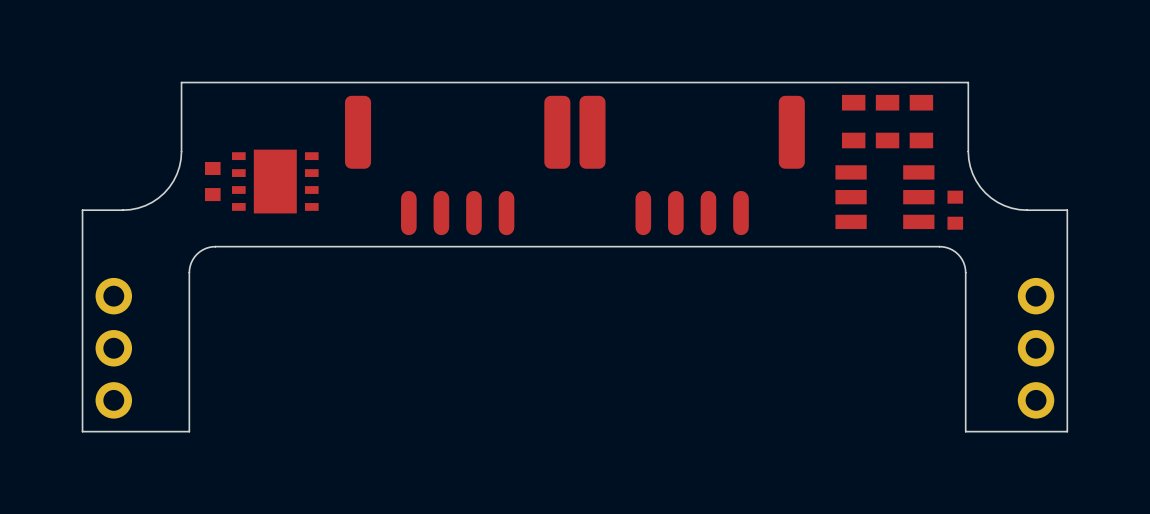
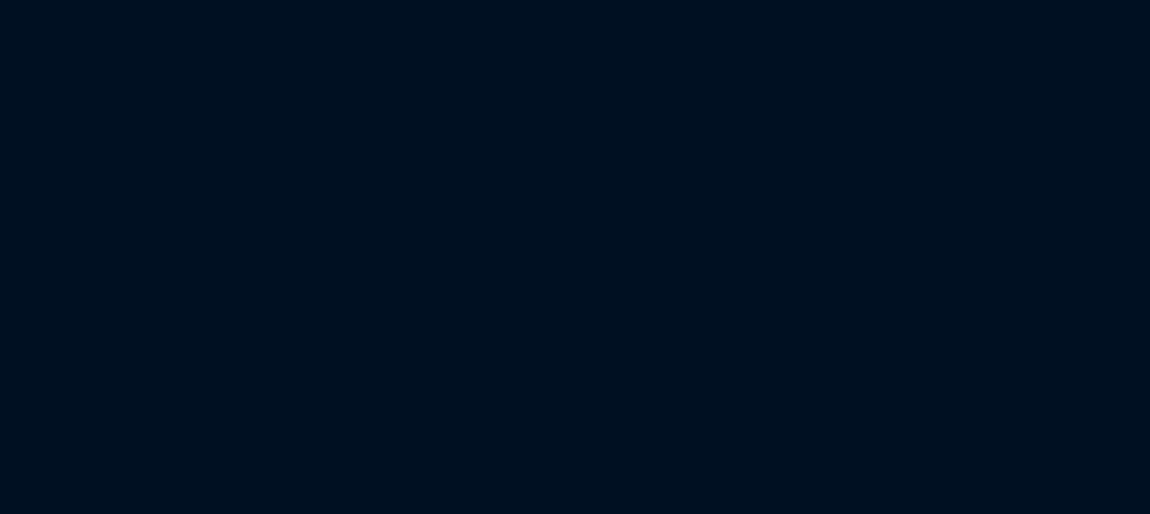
board edge: (968, 82) (968, 159) (972, 174) (980, 187) (997, 202) (1011, 208) (1067, 210) (1067, 431) (965, 431) (965, 269) (962, 259) (955, 252) (939, 246) (208, 247) (194, 256) (189, 269) (189, 431) (82, 431) (82, 210) (138, 208) (152, 202) (169, 187) (177, 174) (181, 159) (181, 82) (968, 82) -> none
part: (853, 121) -> none
part: (887, 121) -> none
part: (921, 121) -> none
part: (457, 165) -> none
part: (692, 165) -> none
part: (212, 181) -> none
part: (275, 181) -> none
part: (884, 197) -> none
part: (955, 210) -> none
part: (113, 348) -> none
part: (1036, 348) -> none

